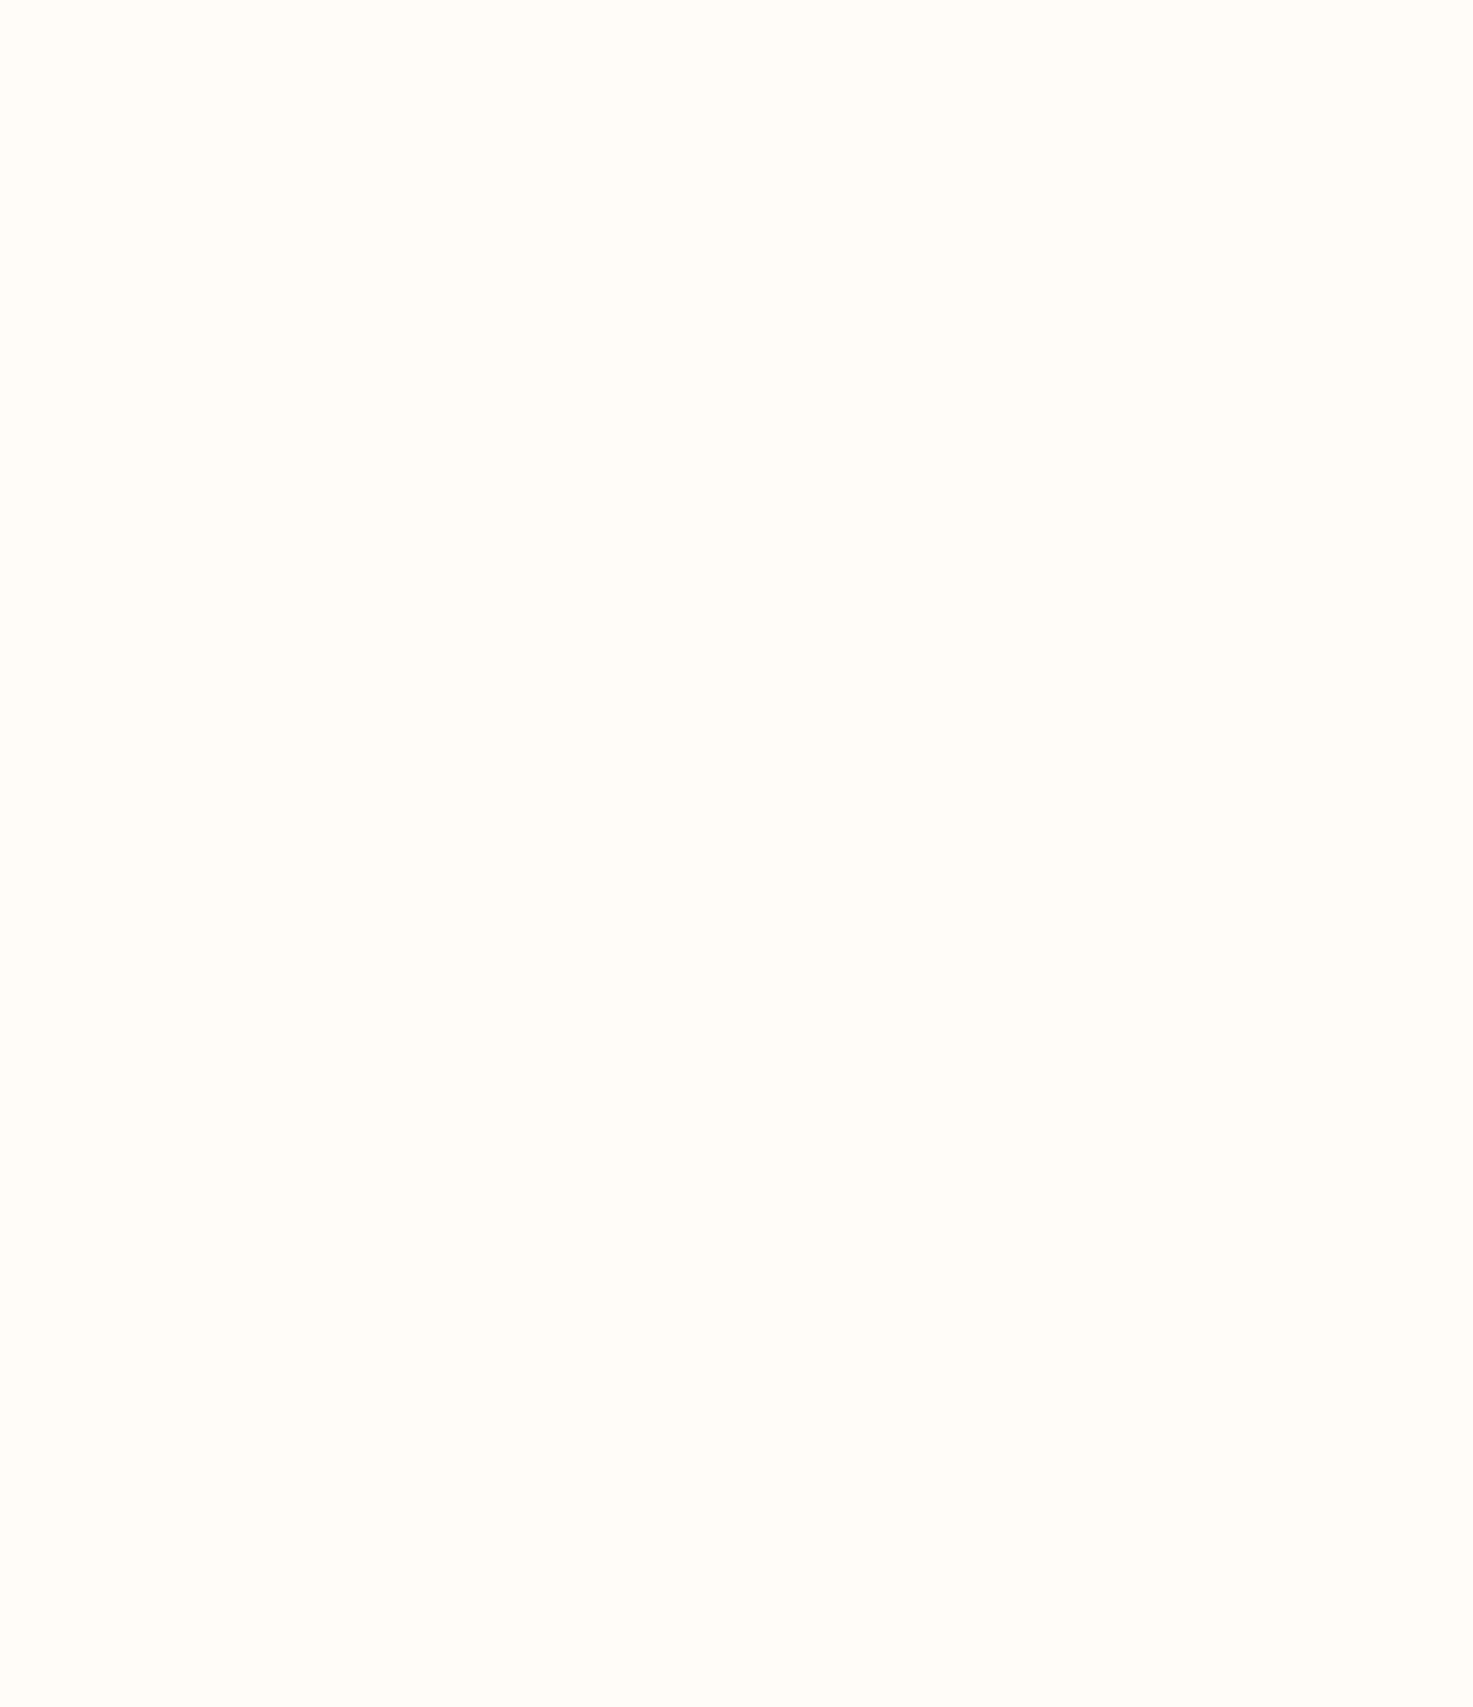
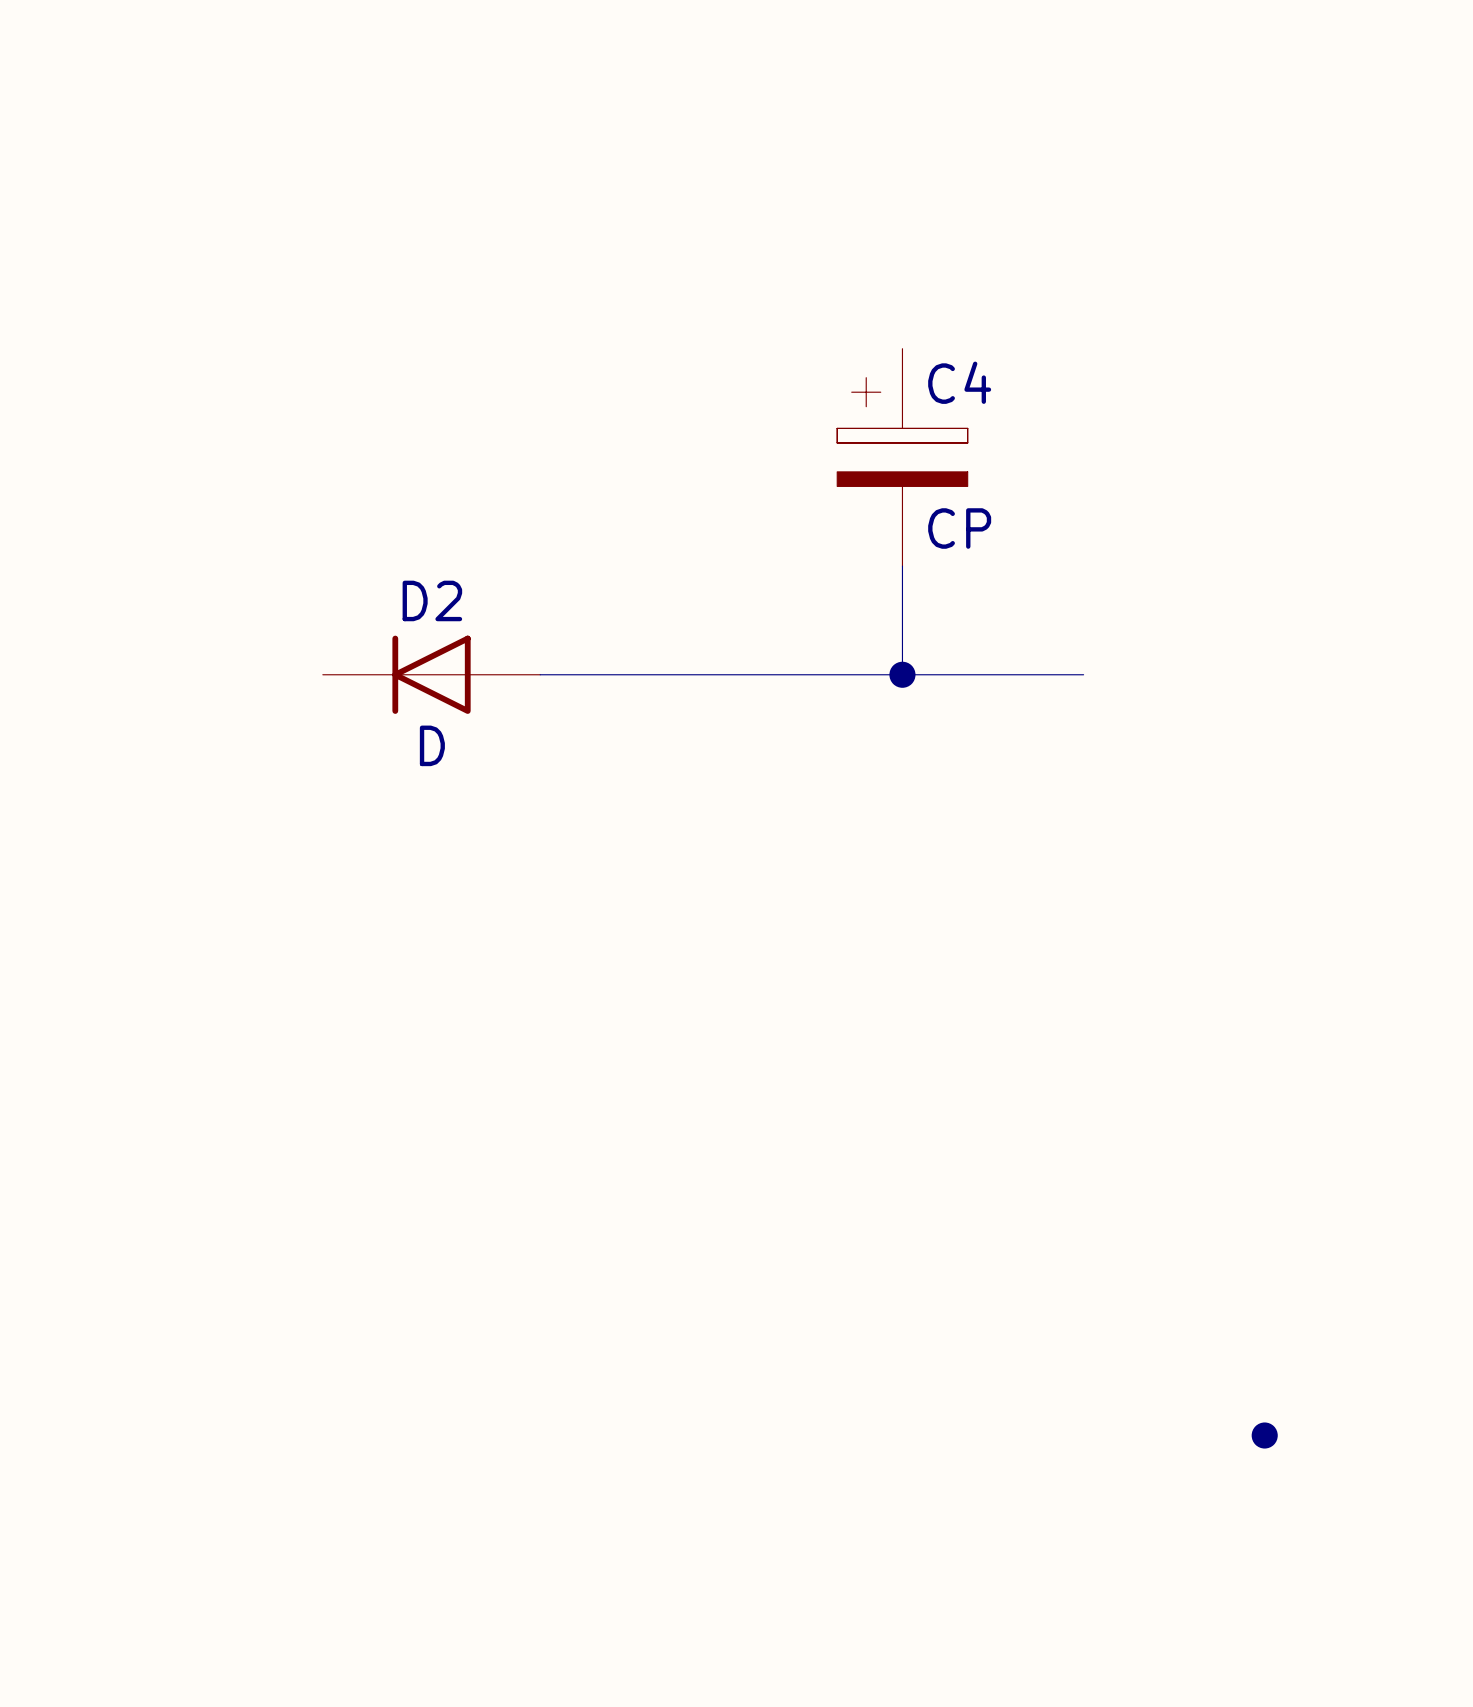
C4: none -> CP (902, 457)
wire: none -> (902, 566) (902, 674)
D2: none -> D (431, 674)
wire: none -> (540, 674) (1083, 674)
junction: none -> (902, 674)
junction: none -> (1264, 1435)

